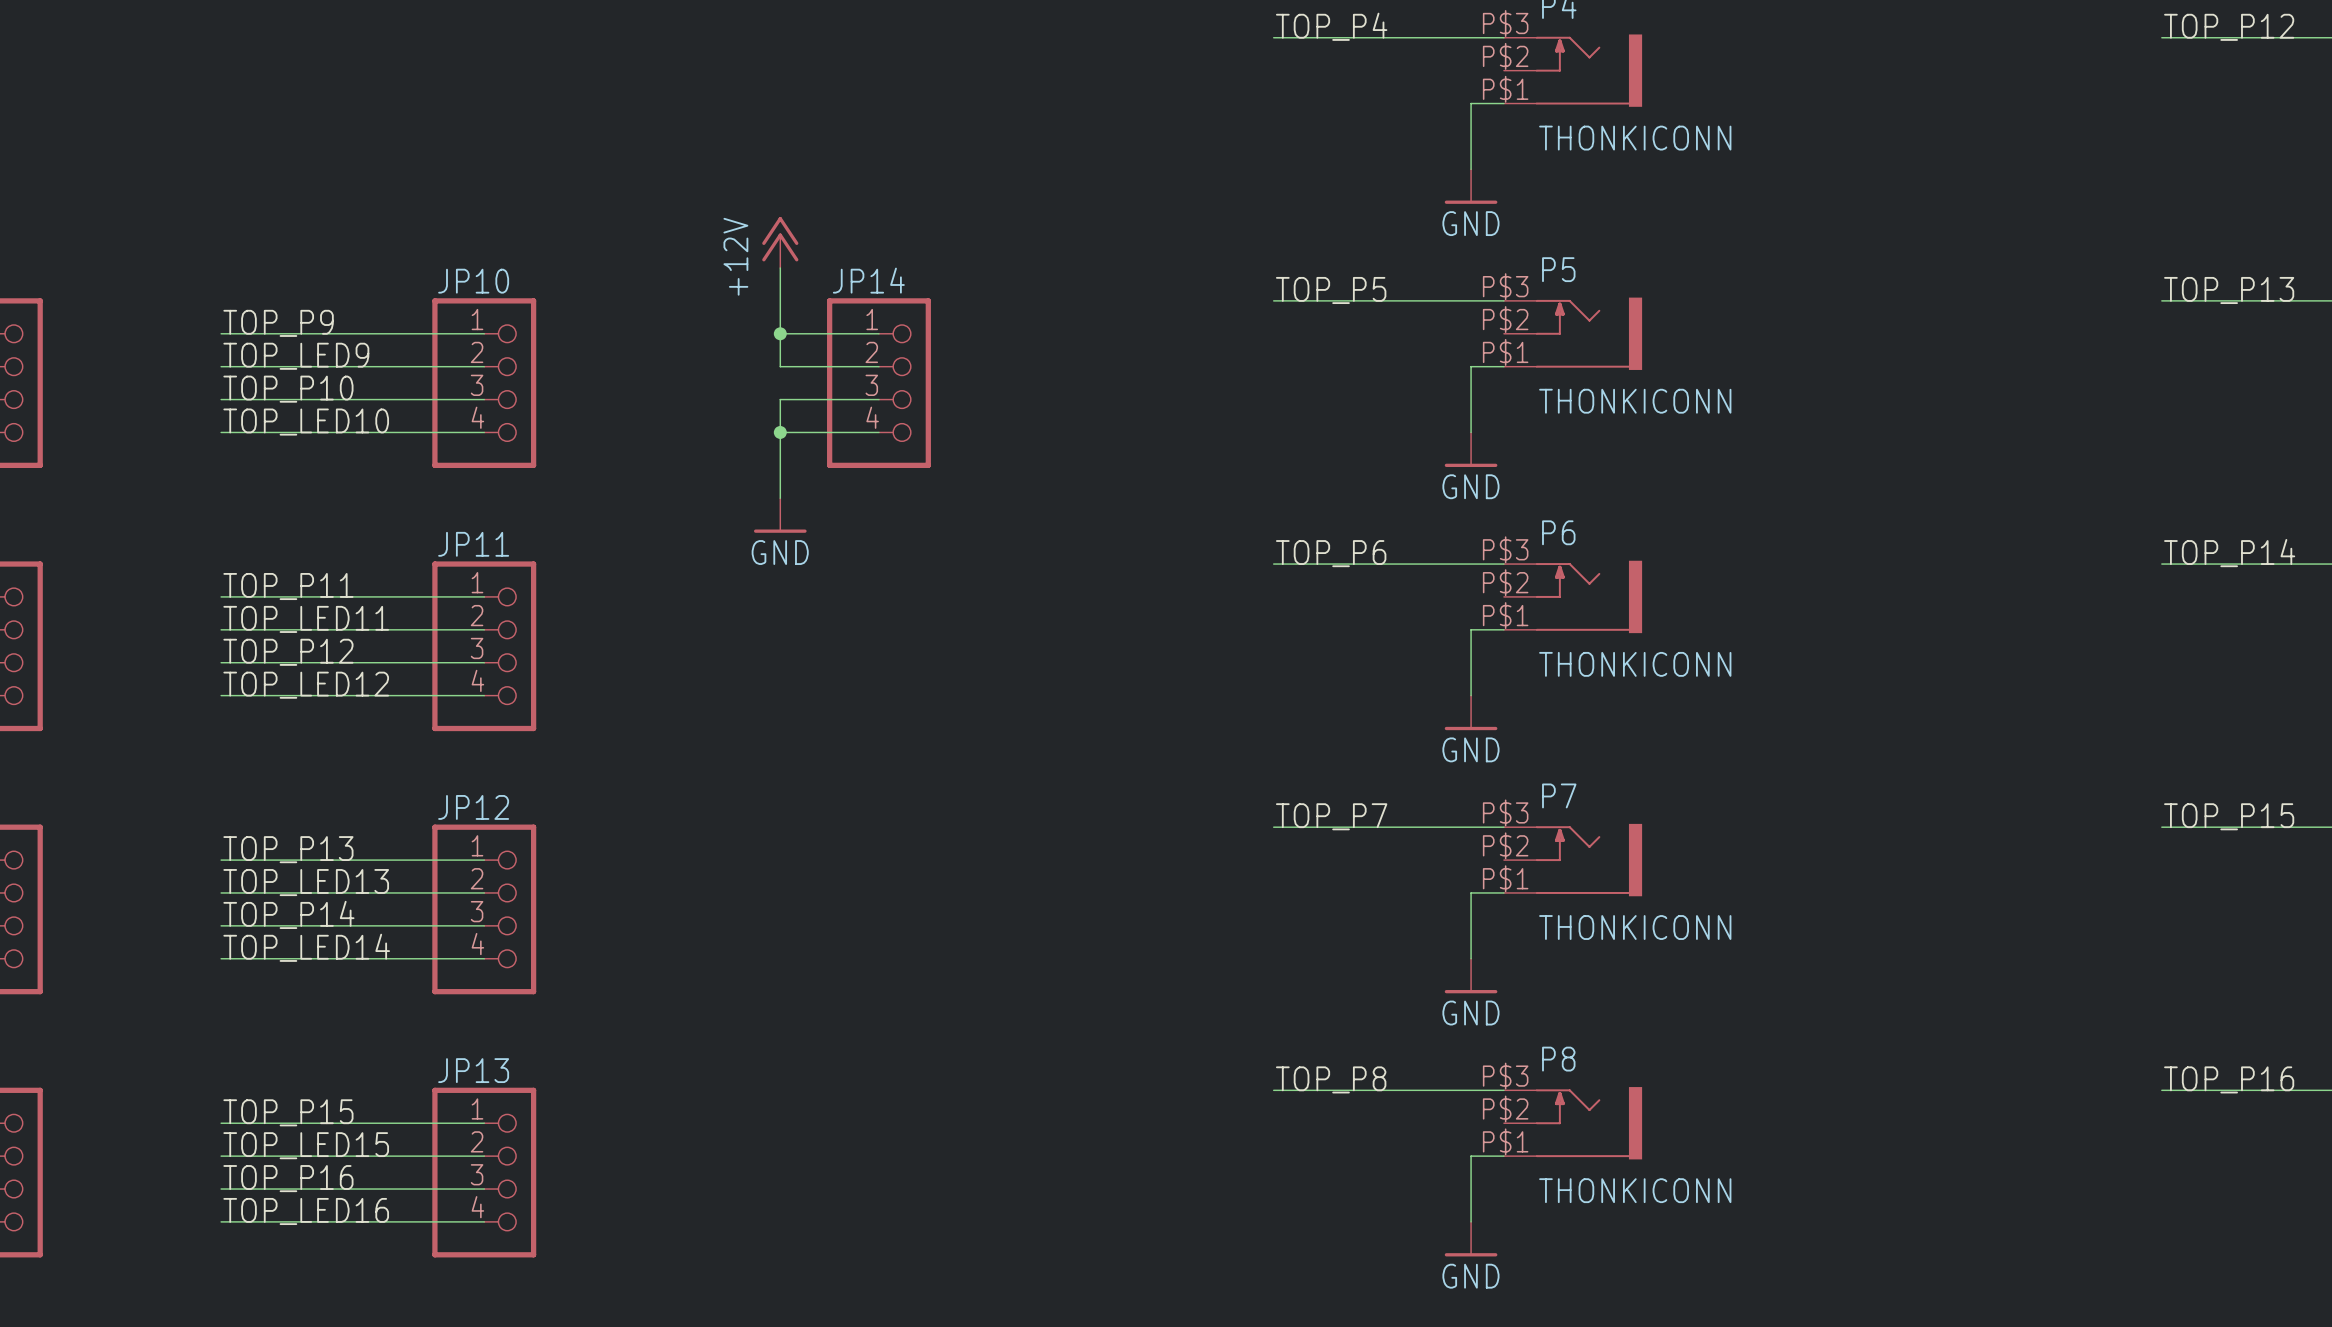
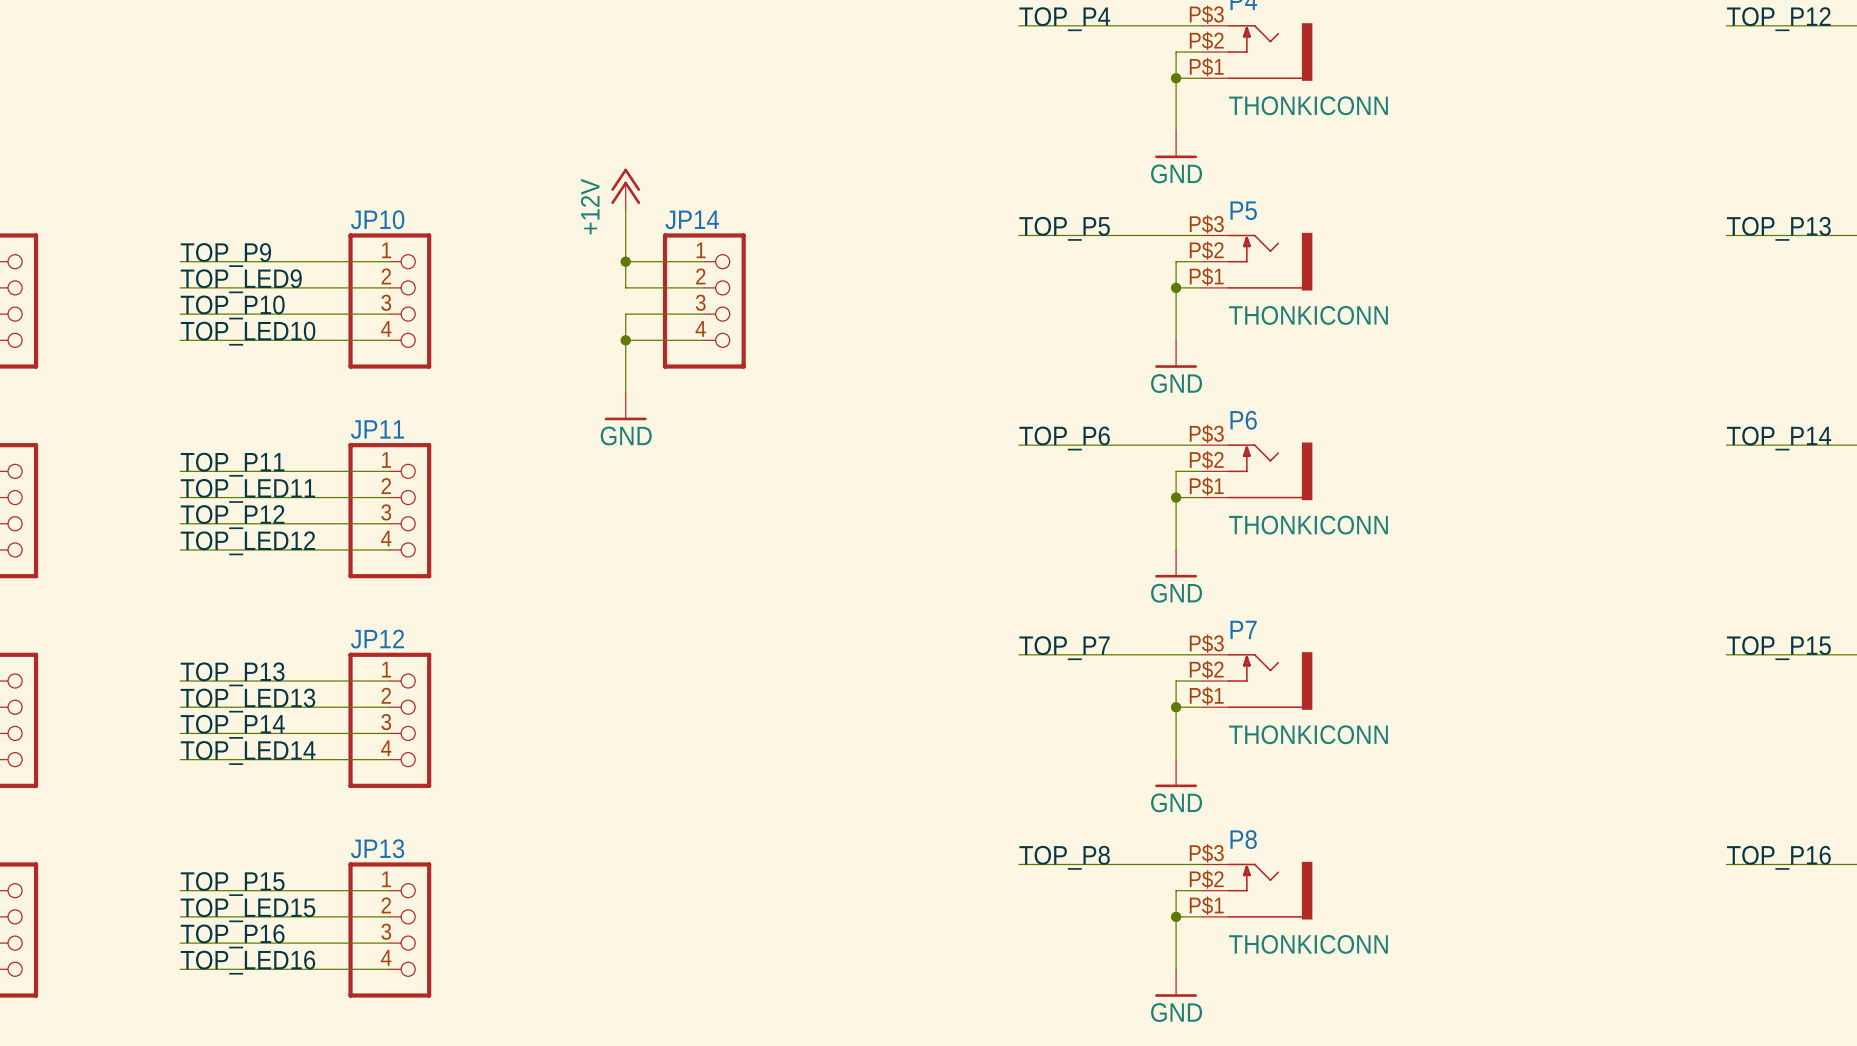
wire: none -> (1202, 52) (1176, 52) (1176, 78)
junction: none -> (1176, 78)
wire: none -> (1202, 261) (1176, 261) (1176, 287)
junction: none -> (1176, 287)
wire: none -> (1202, 471) (1176, 471) (1176, 497)
junction: none -> (1176, 497)
wire: none -> (1202, 681) (1176, 681) (1176, 707)
junction: none -> (1176, 707)
wire: none -> (1202, 890) (1176, 890) (1176, 916)
junction: none -> (1176, 916)

